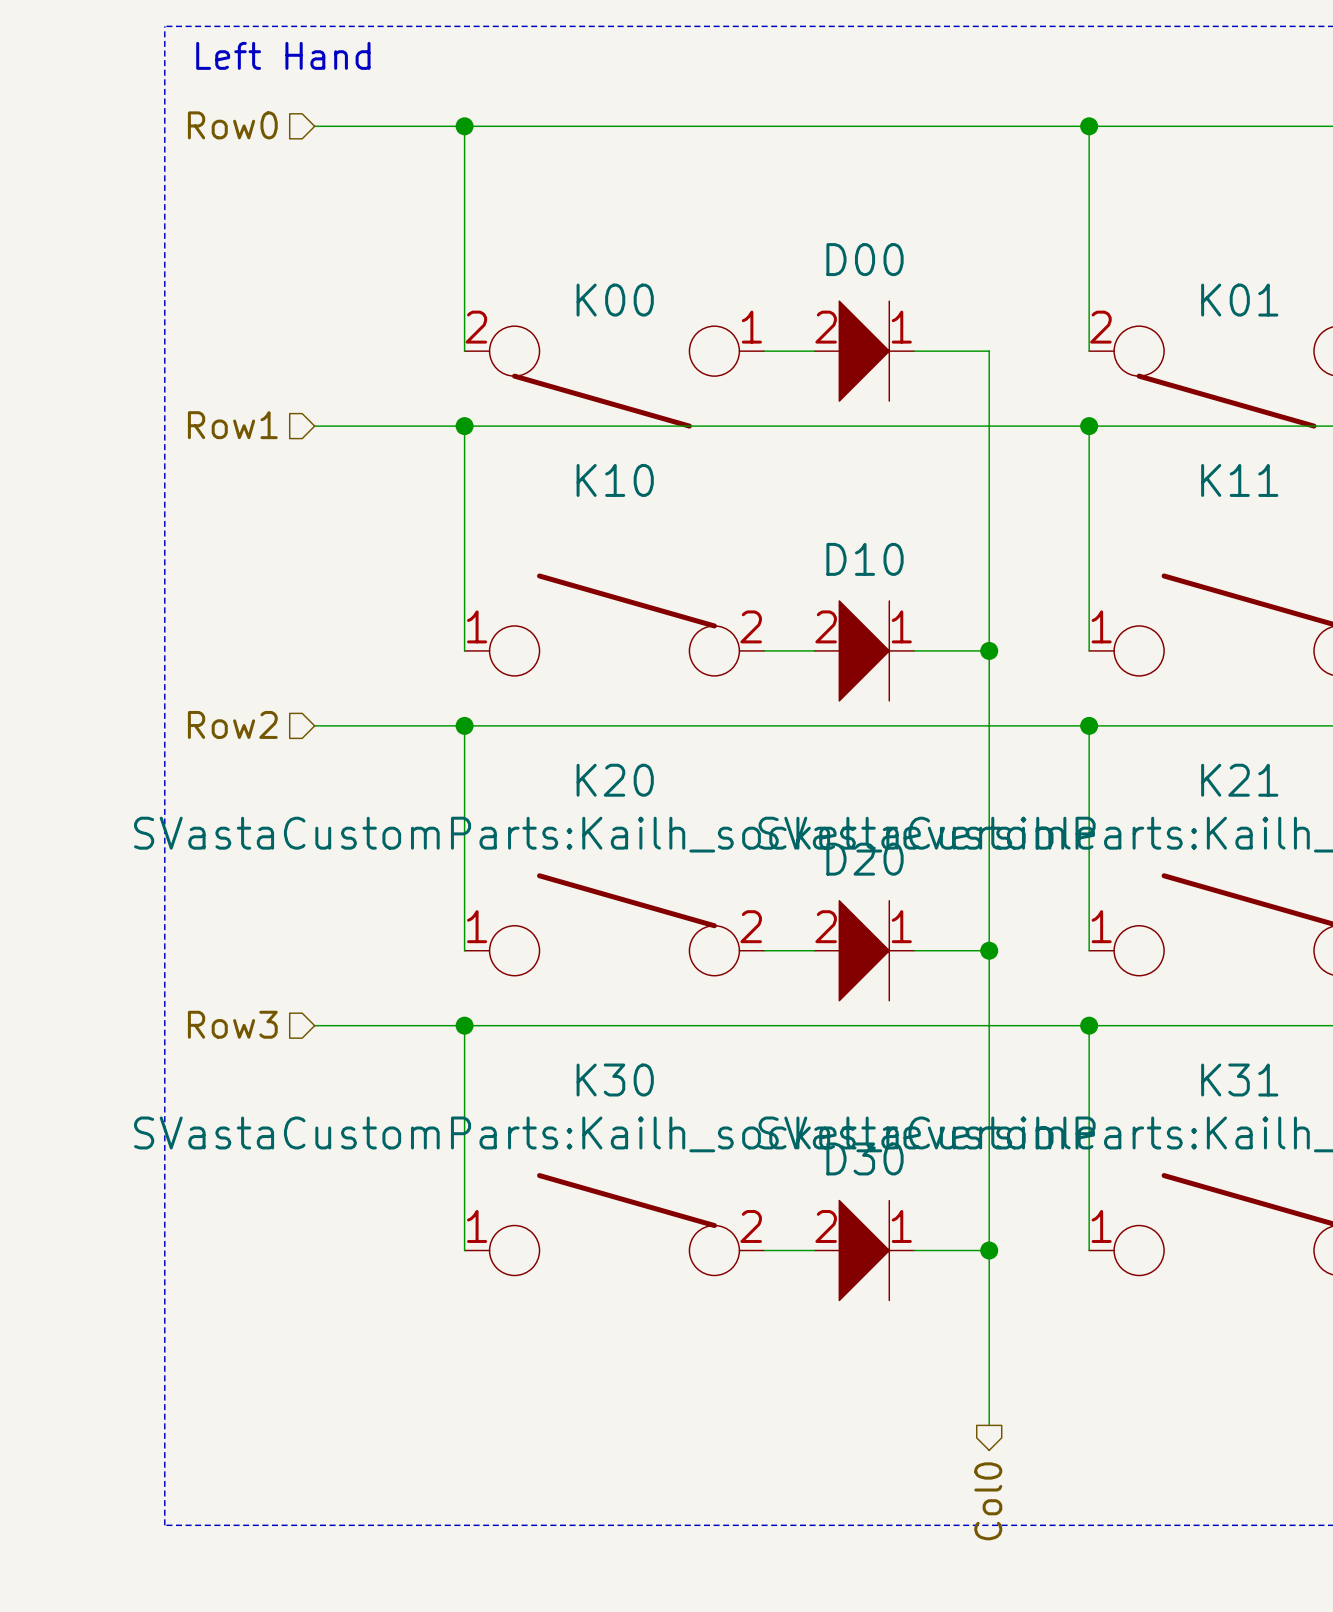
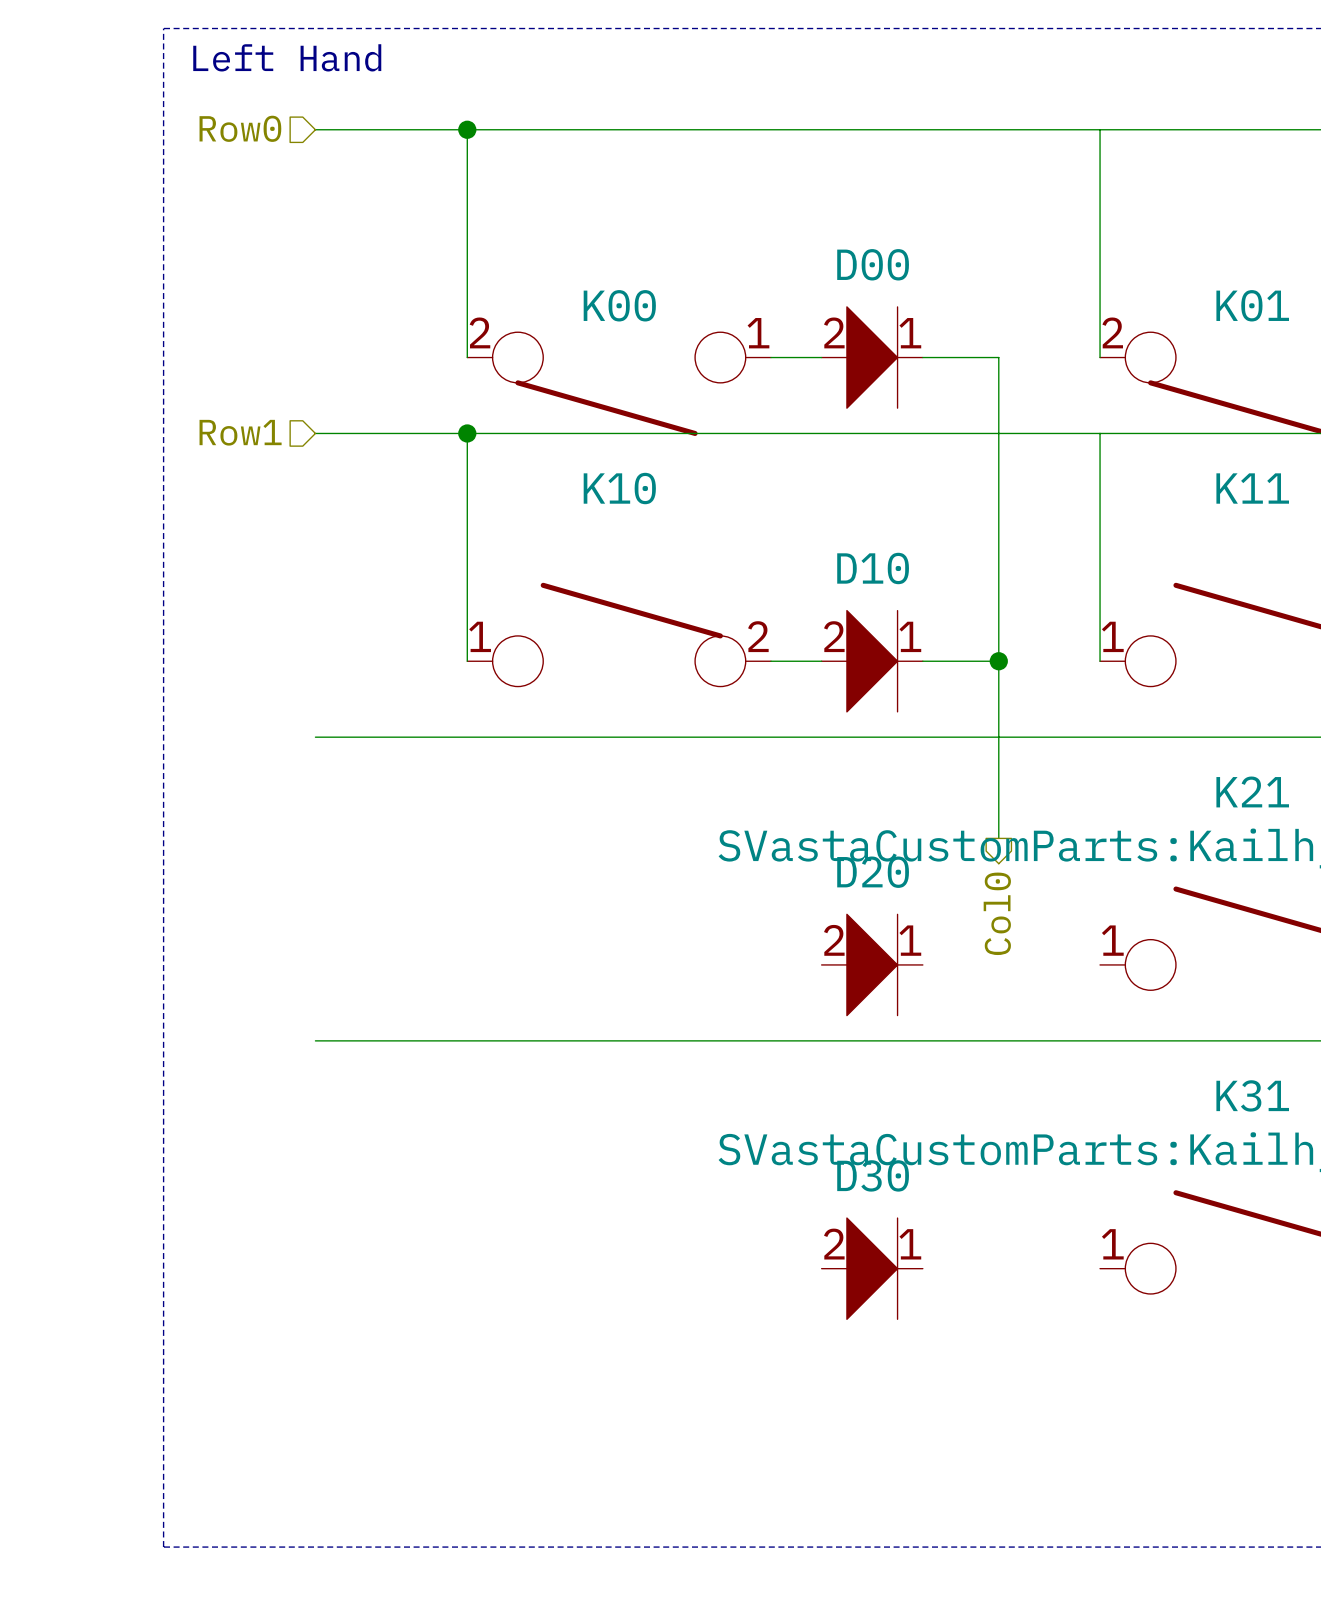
junction: (1089, 126) -> none
junction: (1089, 426) -> none
hierarchical label: Row2 (232, 724) -> none
wire: (464, 725) (464, 950) -> none
junction: (464, 725) -> none
wire: (1089, 725) (1089, 950) -> none
junction: (1089, 725) -> none
wire: (989, 825) (989, 1425) -> none
hierarchical label: none -> Col0 (997, 913)
K20: (614, 924) -> none
wire: (764, 950) (814, 950) -> none
wire: (914, 950) (989, 950) -> none
junction: (989, 950) -> none
hierarchical label: Row3 (232, 1024) -> none
wire: (464, 1025) (464, 1250) -> none
junction: (464, 1025) -> none
wire: (1089, 1025) (1089, 1250) -> none
junction: (1089, 1025) -> none
K30: (614, 1224) -> none
wire: (764, 1250) (814, 1250) -> none
wire: (914, 1250) (989, 1250) -> none
junction: (989, 1250) -> none
hierarchical label: Col0 (988, 1501) -> none

